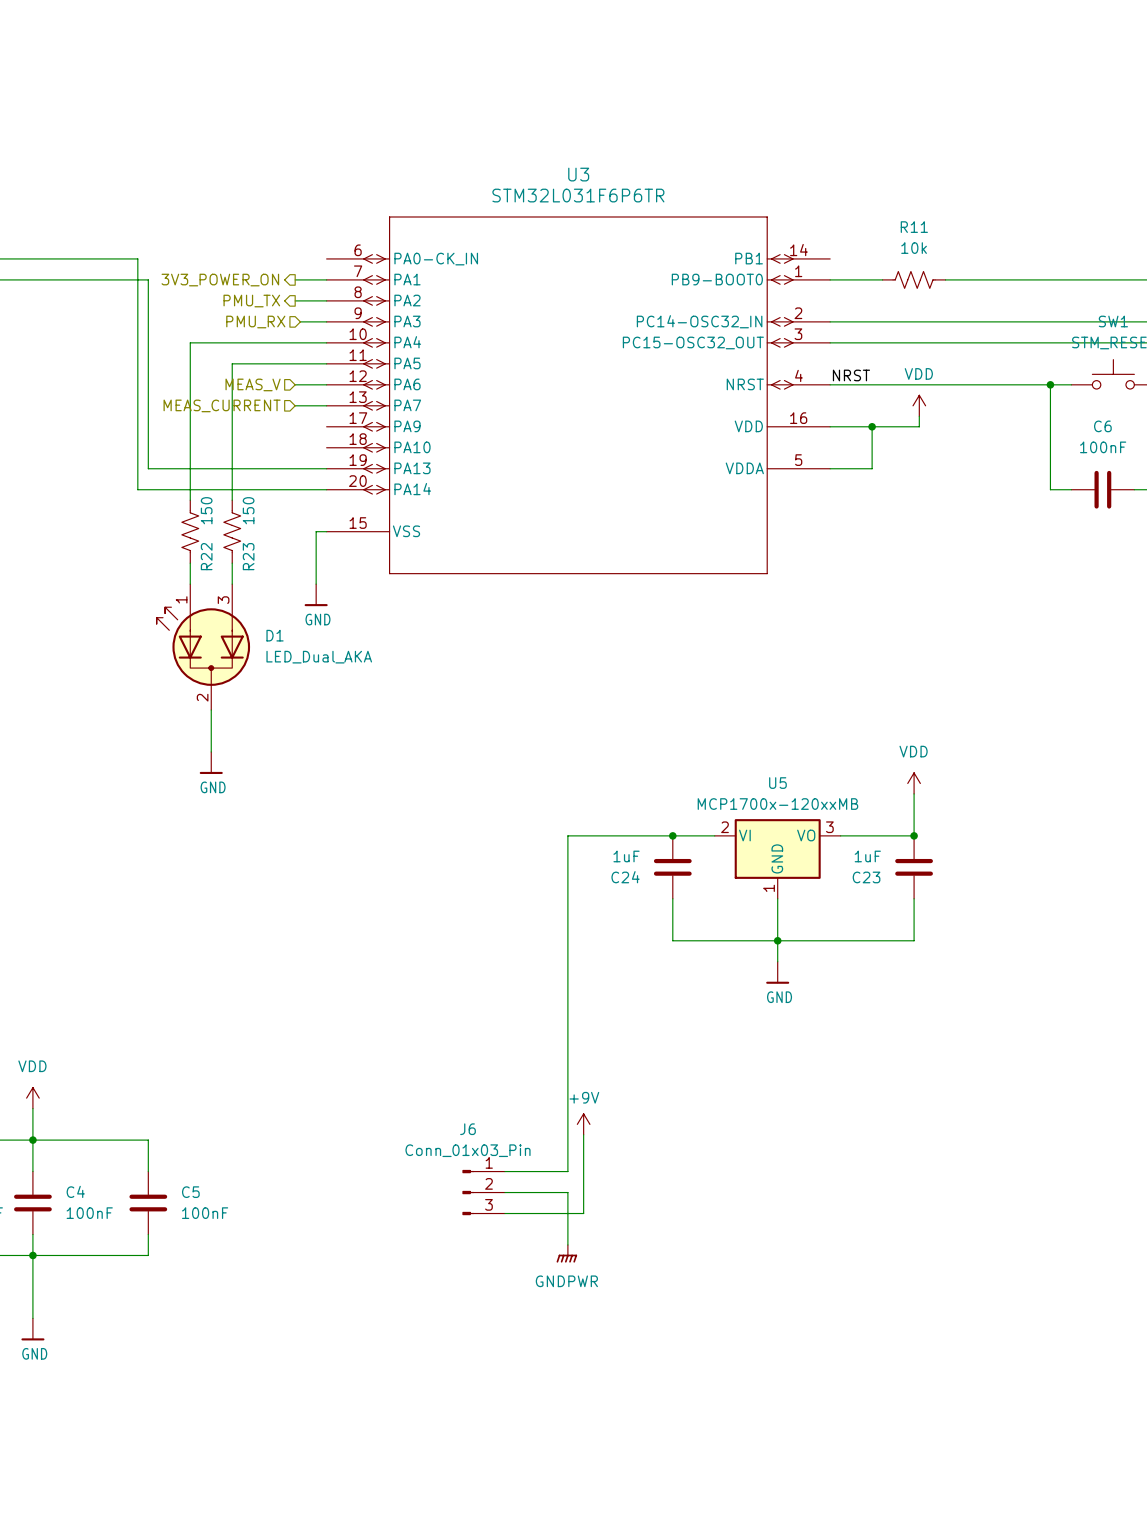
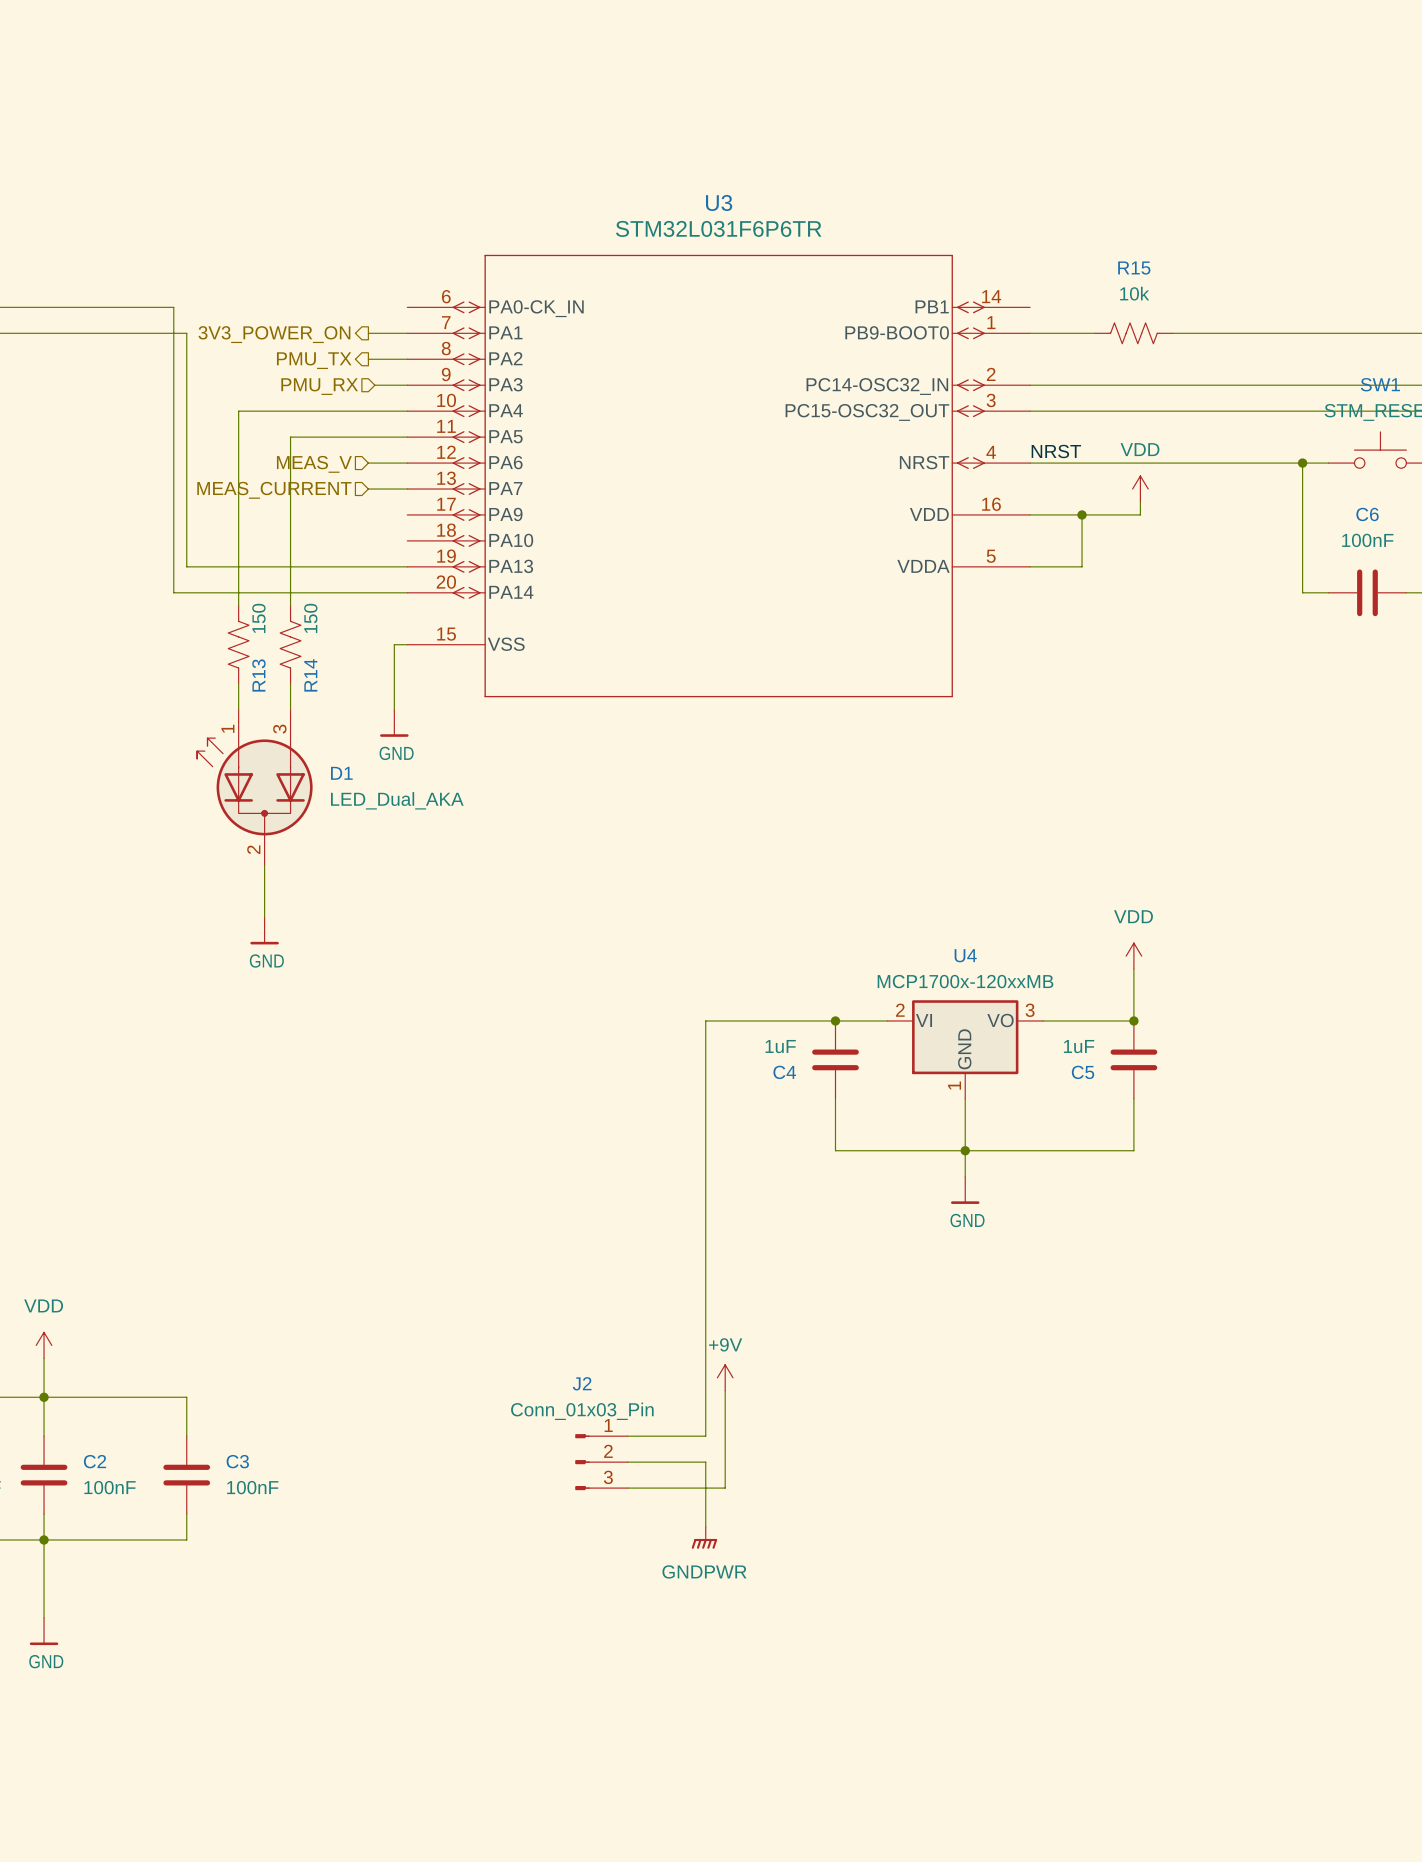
R11 name: R11 (914, 227) -> R15 (1134, 268)
R22 name: R22 (206, 556) -> R13 (258, 675)
R23 name: R23 (248, 556) -> R14 (310, 675)
U5 name: U5 (777, 783) -> U4 (965, 955)
C24 name: C24 (625, 877) -> C4 (784, 1072)
C23 name: C23 (866, 877) -> C5 (1083, 1072)
J6 name: J6 (468, 1129) -> J2 (582, 1383)
C4 name: C4 (75, 1191) -> C2 (95, 1461)
C5 name: C5 (190, 1192) -> C3 (237, 1461)

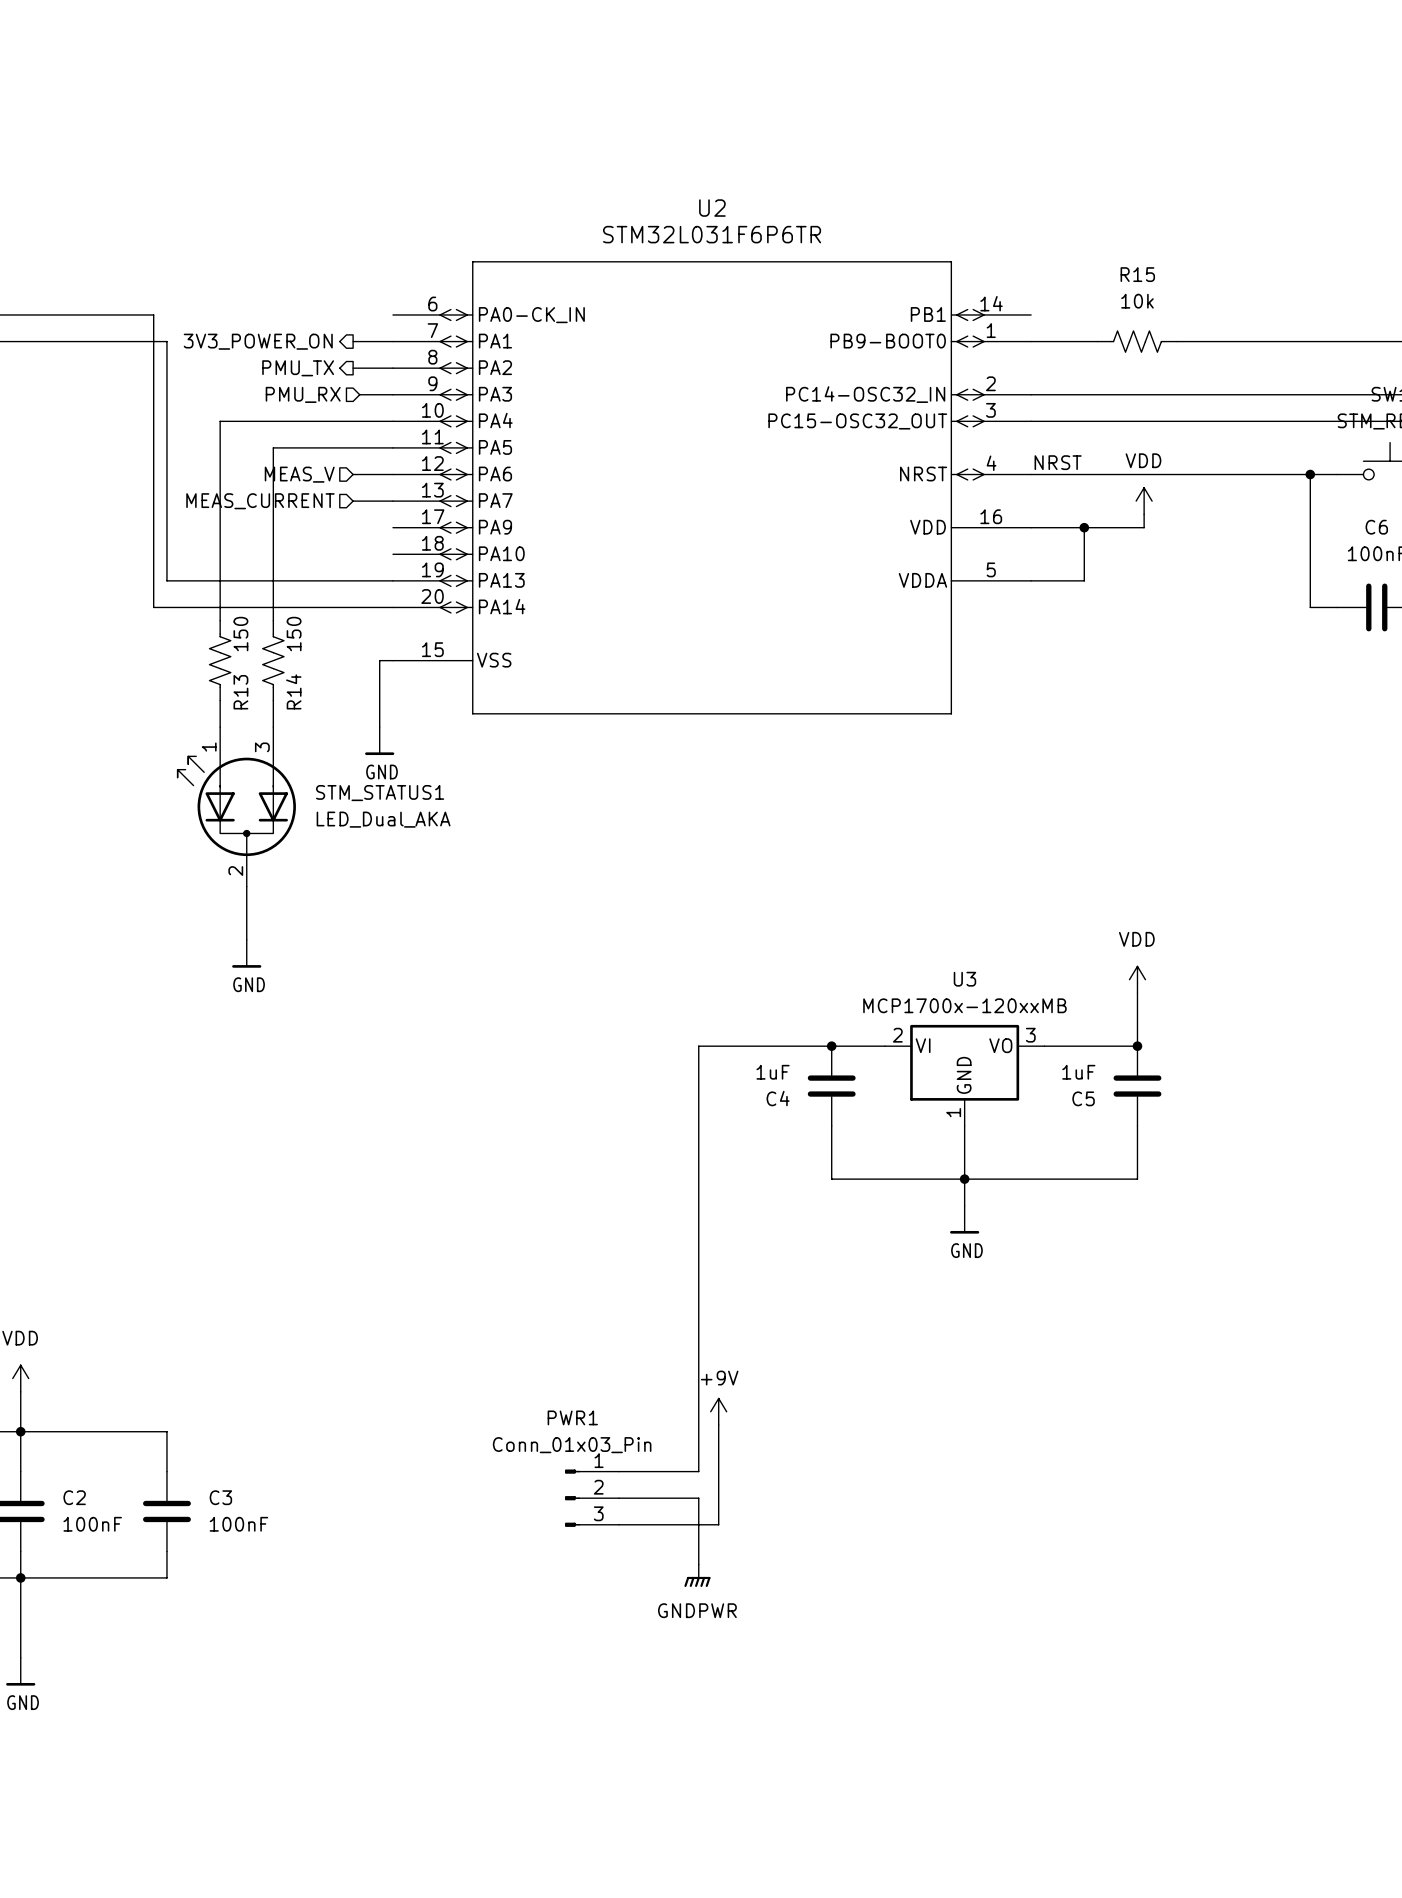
U3 name: U3 (719, 202) -> U2 (712, 208)
D1 name: D1 (341, 773) -> STM_STATUS1 (380, 793)
U4 name: U4 (965, 955) -> U3 (964, 979)
J2 name: J2 (582, 1383) -> PWR1 (572, 1417)

